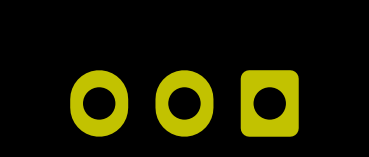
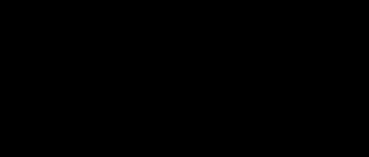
part: (184, 103) -> none

